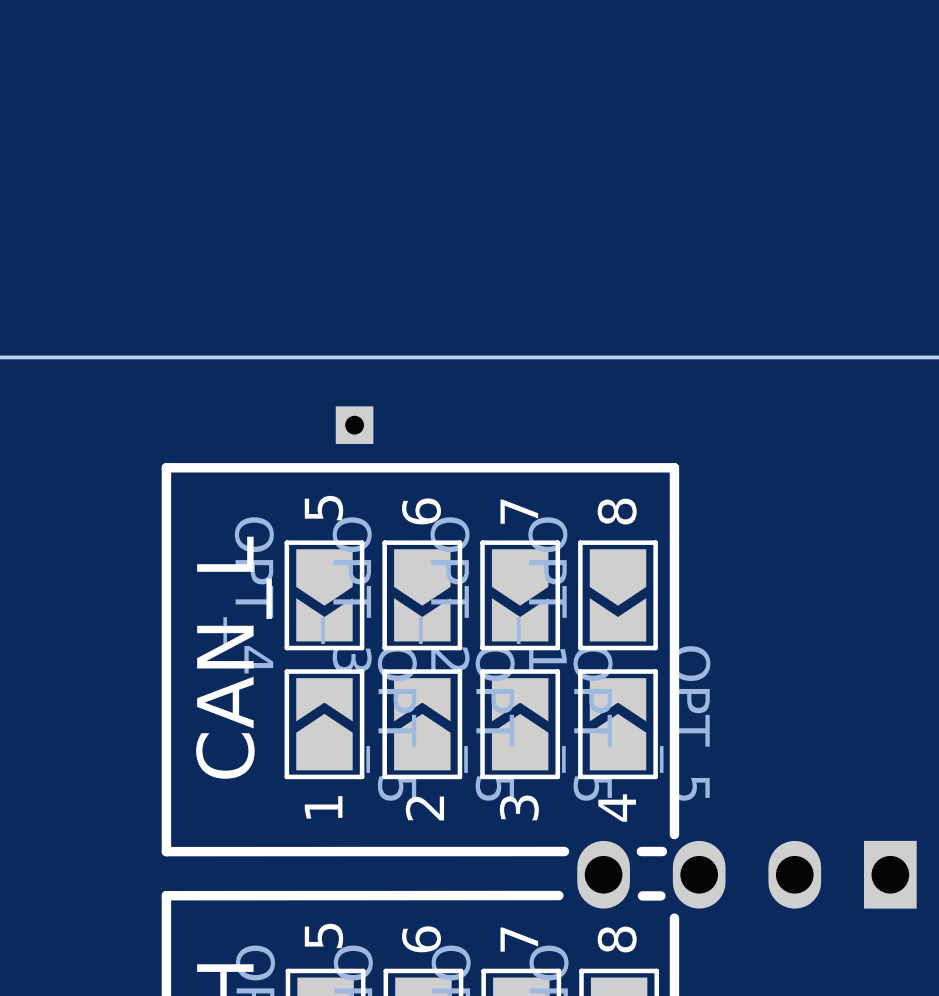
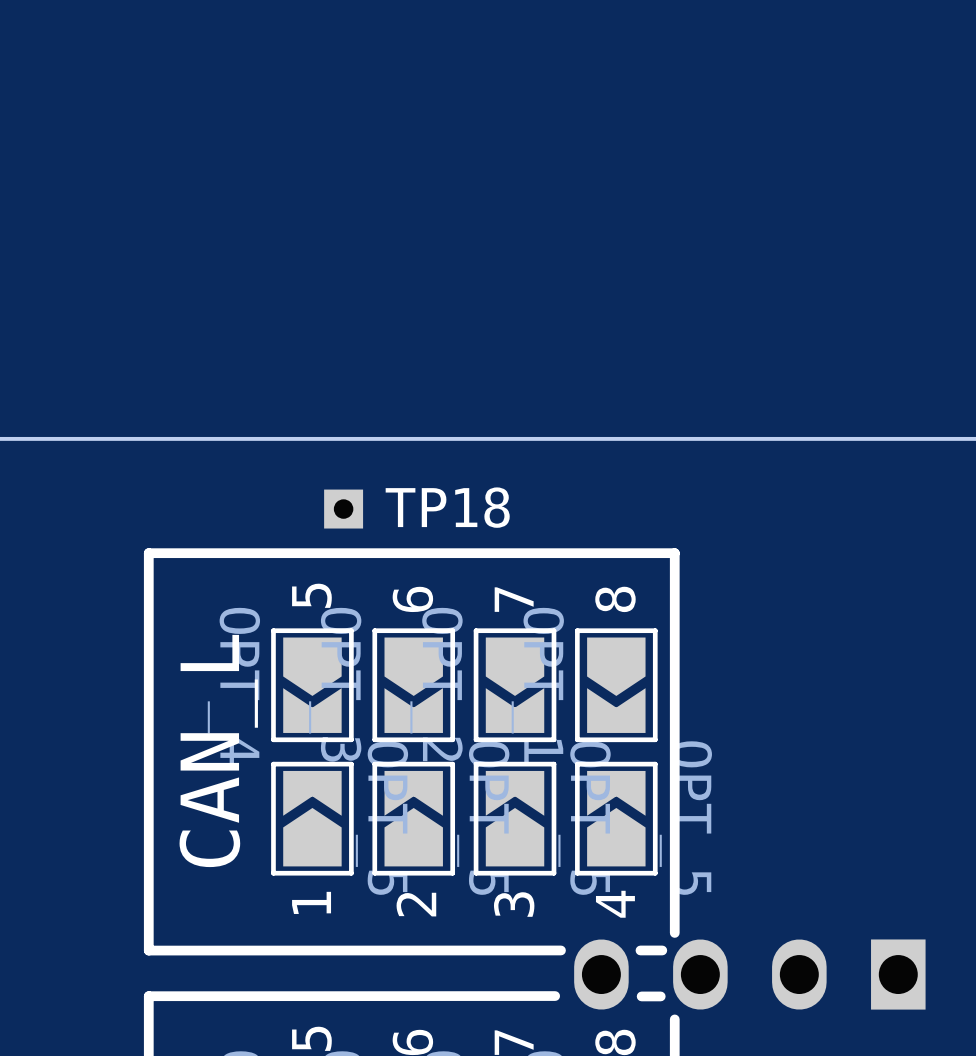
TP18 name: none -> TP18 (447, 507)

